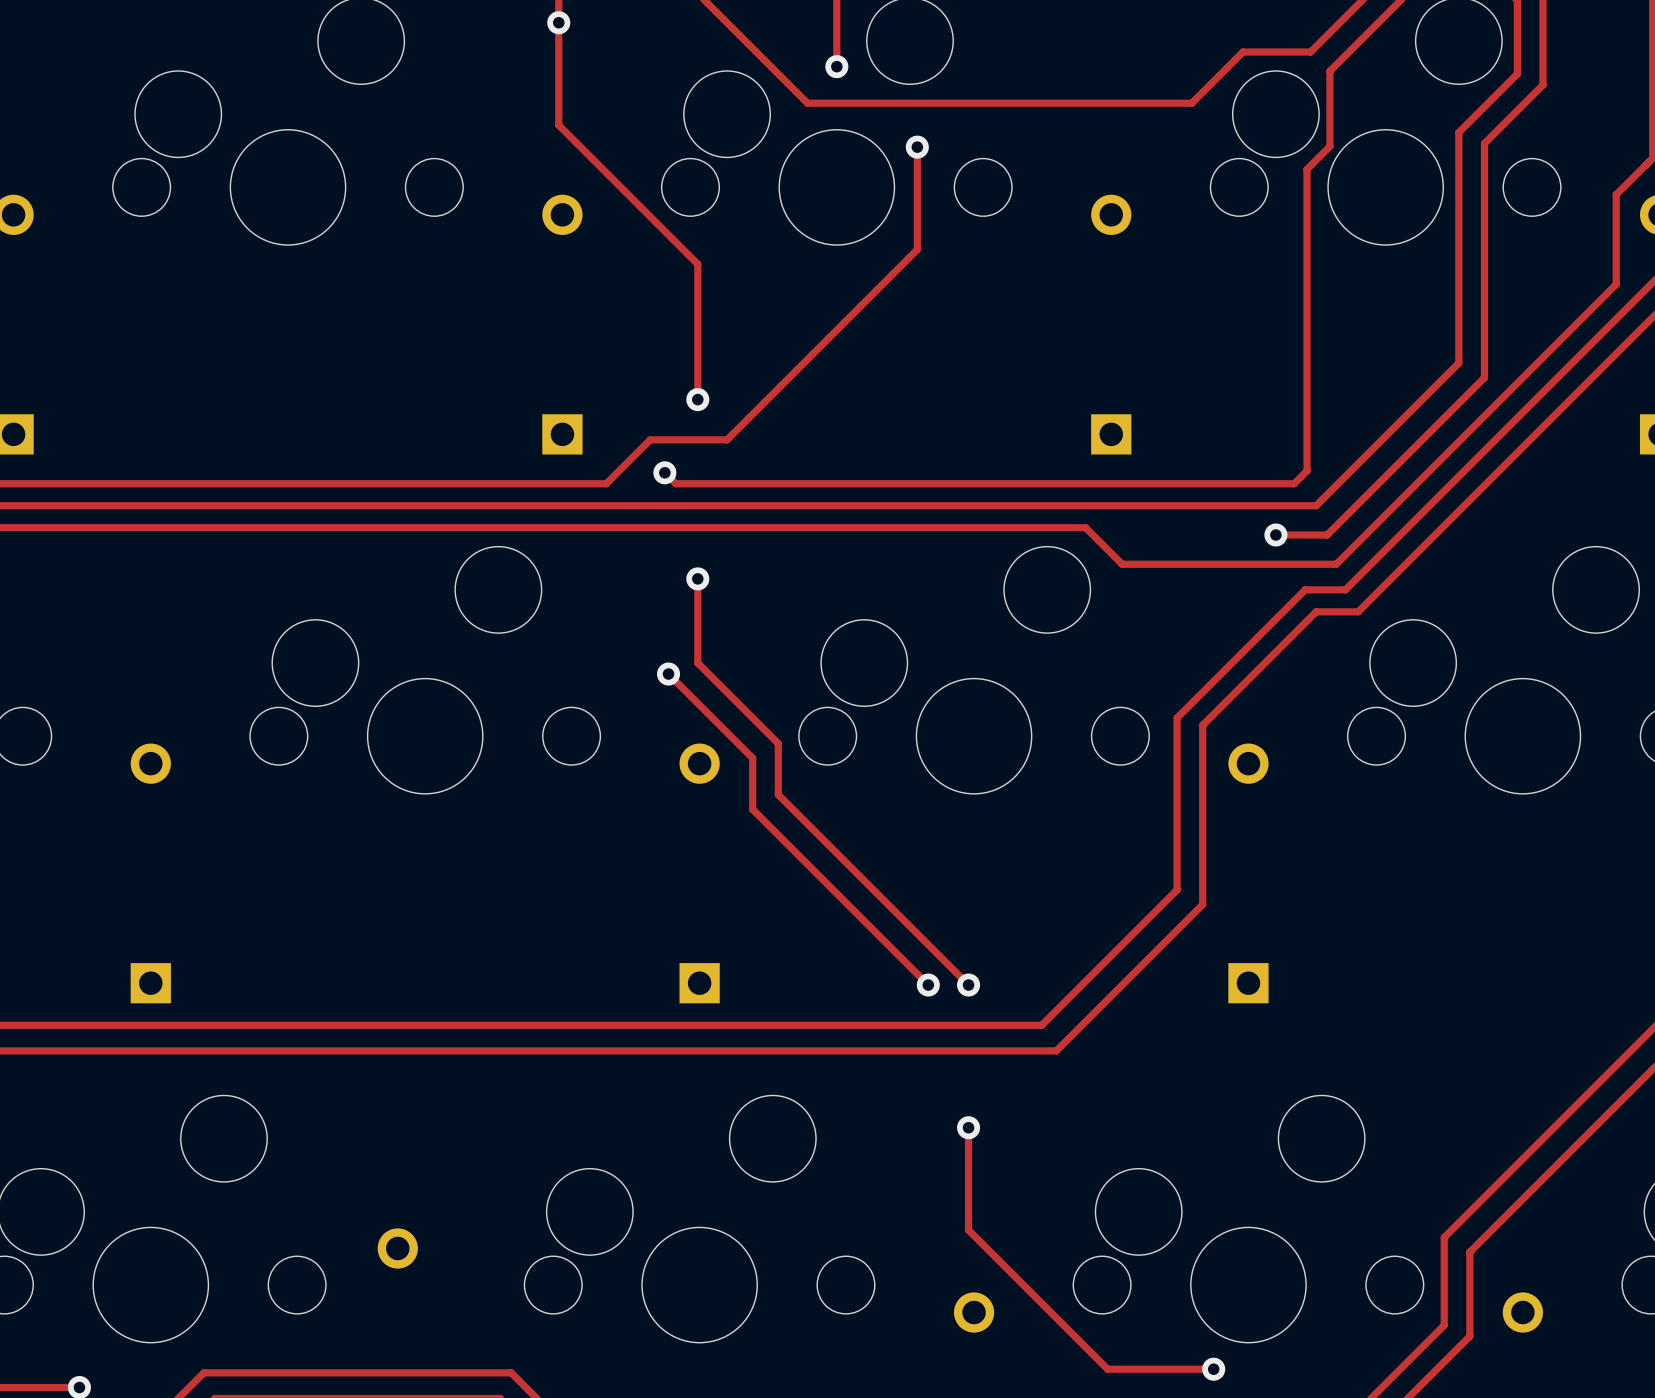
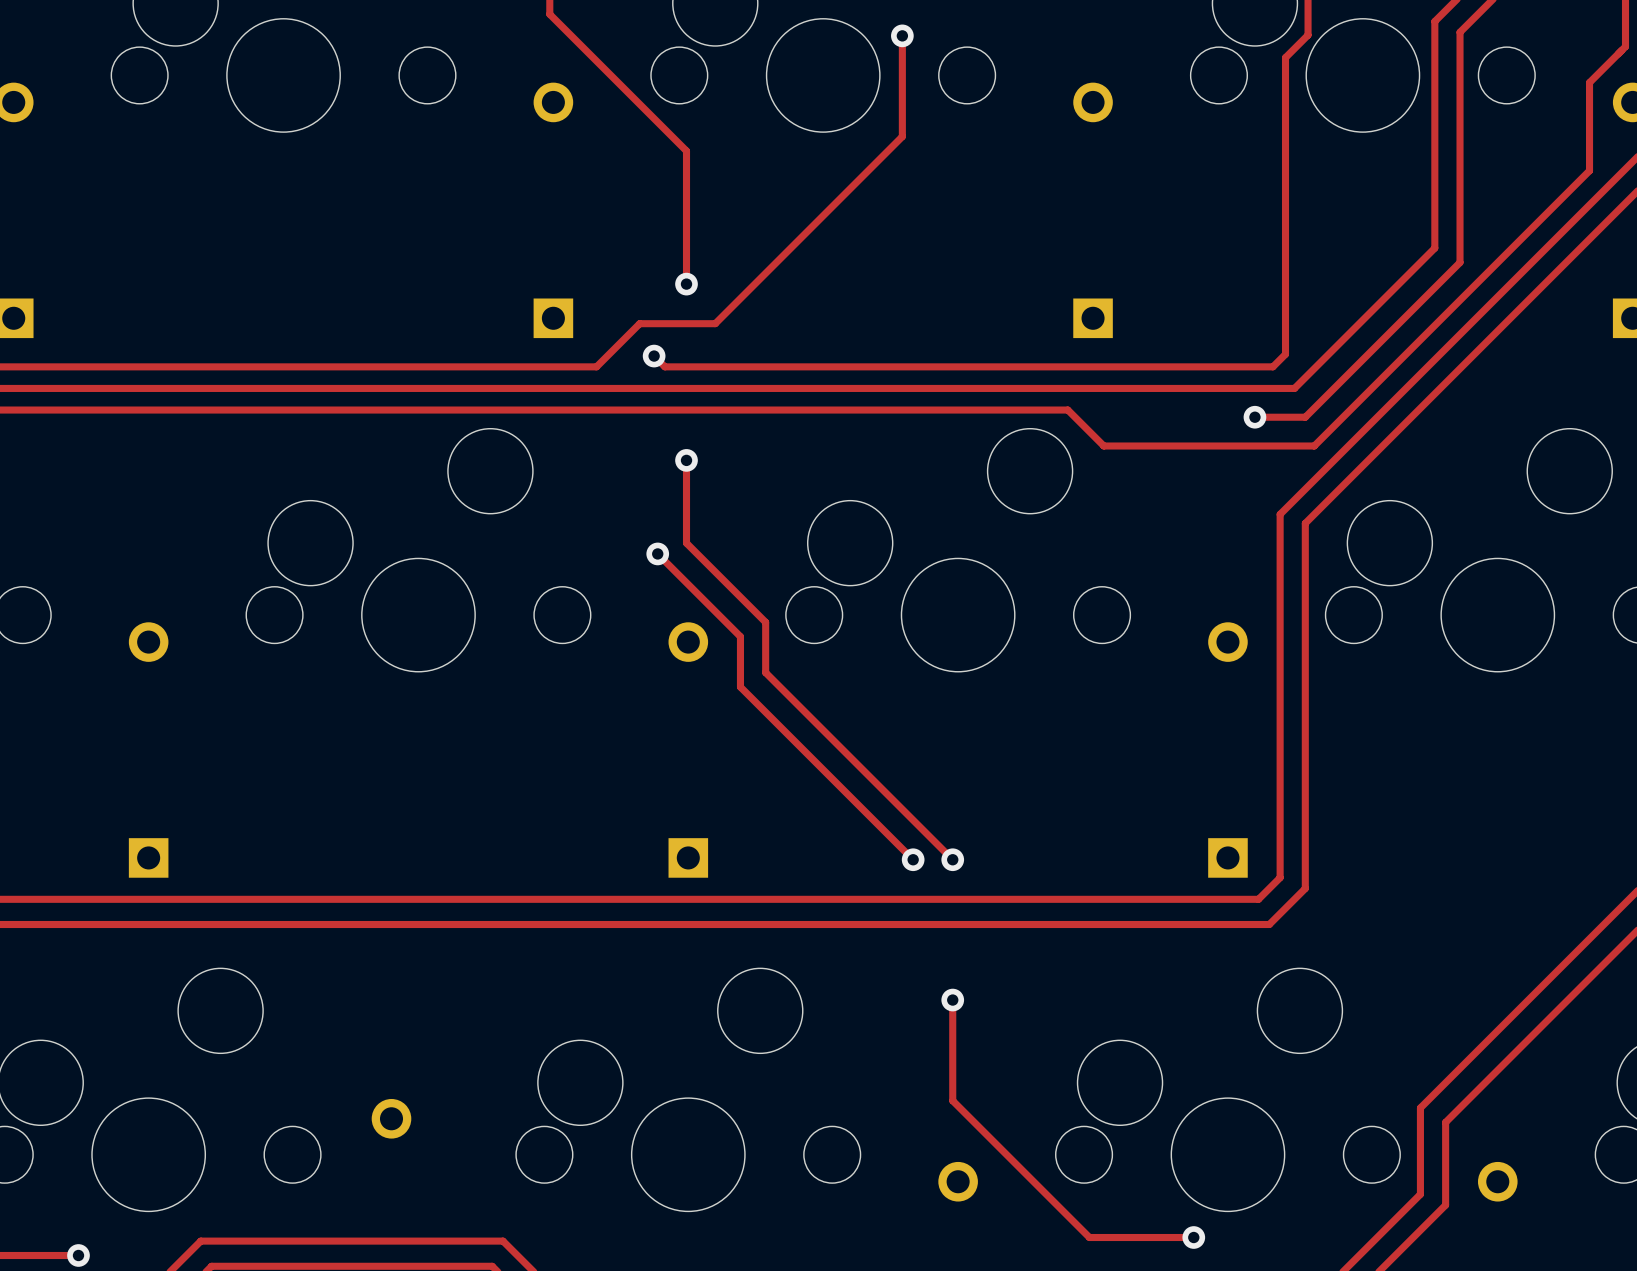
track: (1345, 589) (1305, 589) (1177, 717) (1177, 889) (1041, 1025) -> (1323, 471) (1280, 514) (1280, 877) (1258, 899) (1024, 899)
track: (1358, 611) (1316, 611) (1202, 725) (1202, 904) (1056, 1050) -> (1335, 492) (1305, 523) (1305, 888) (1269, 924) (1039, 924)

